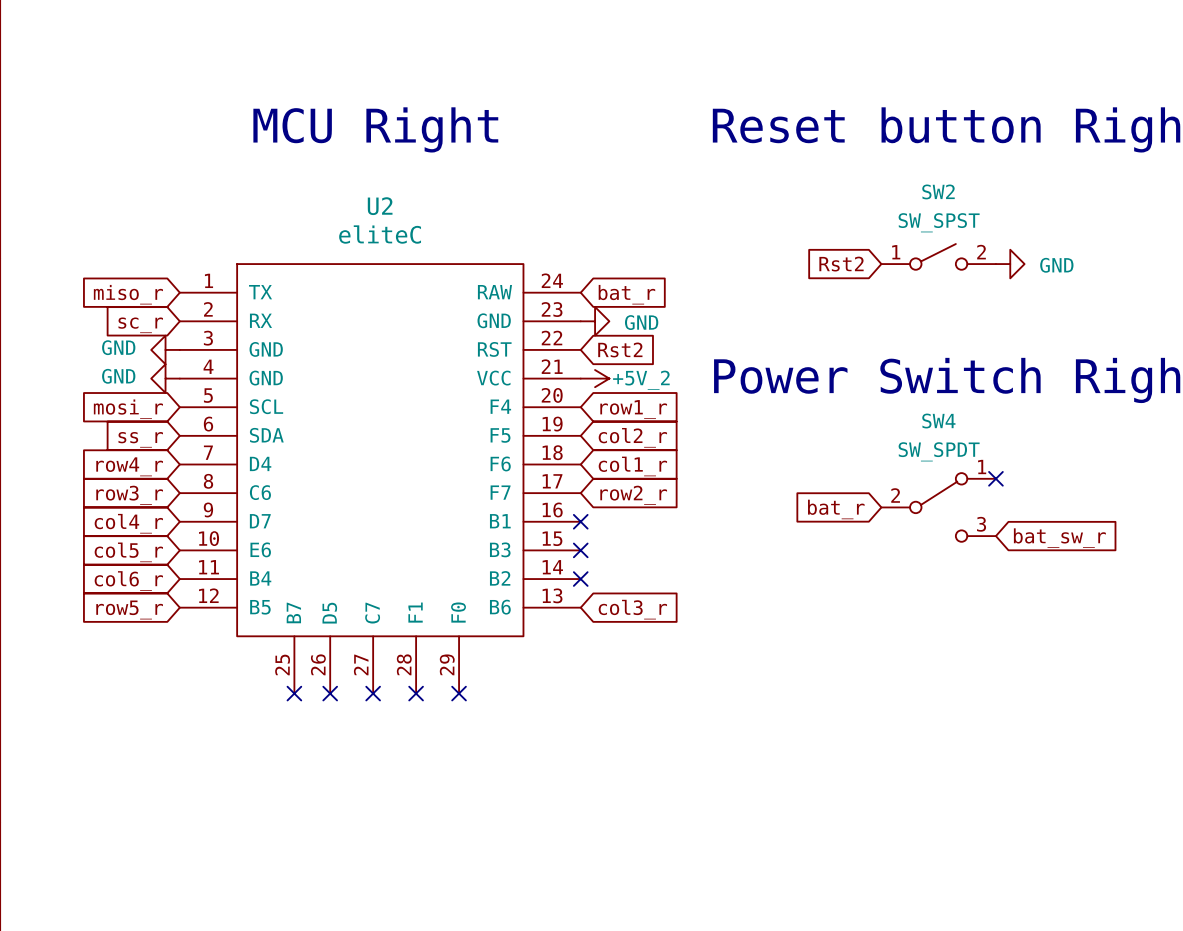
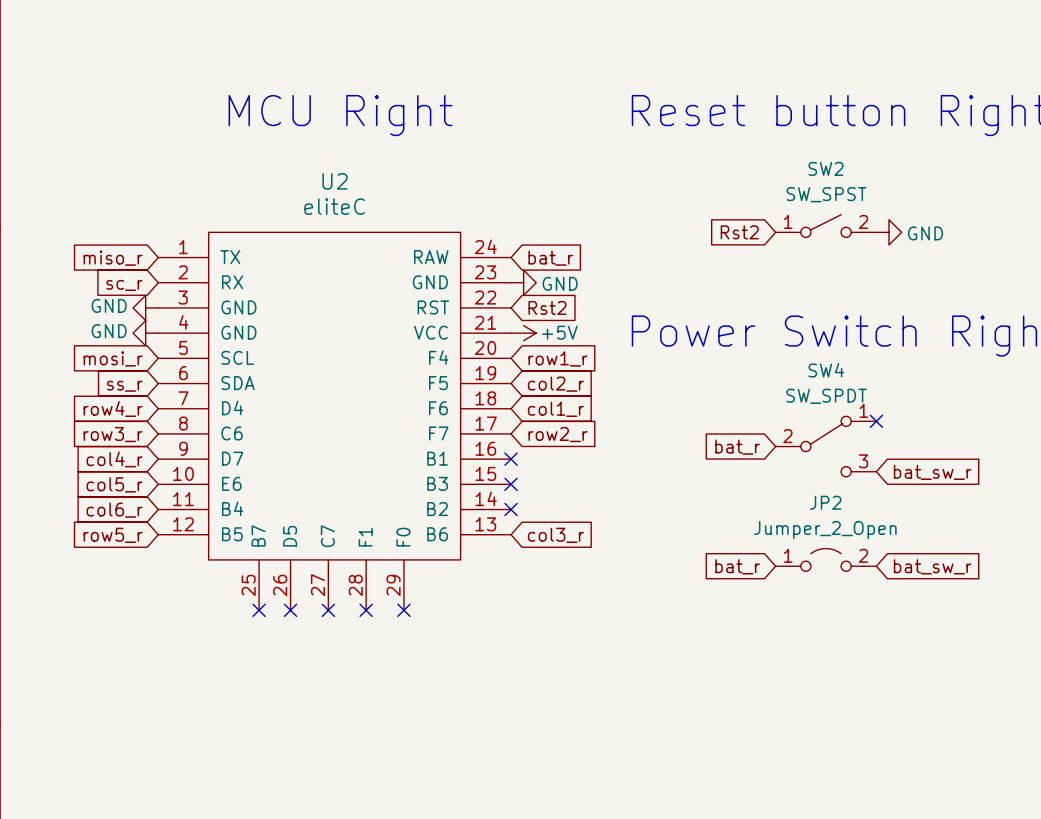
power symbol: +5V_2 (595, 378) -> +5V (523, 333)
JP2: none -> Jumper_2_Open (826, 559)
global label: none -> bat_r (737, 566)
global label: none -> bat_sw_r (932, 566)

